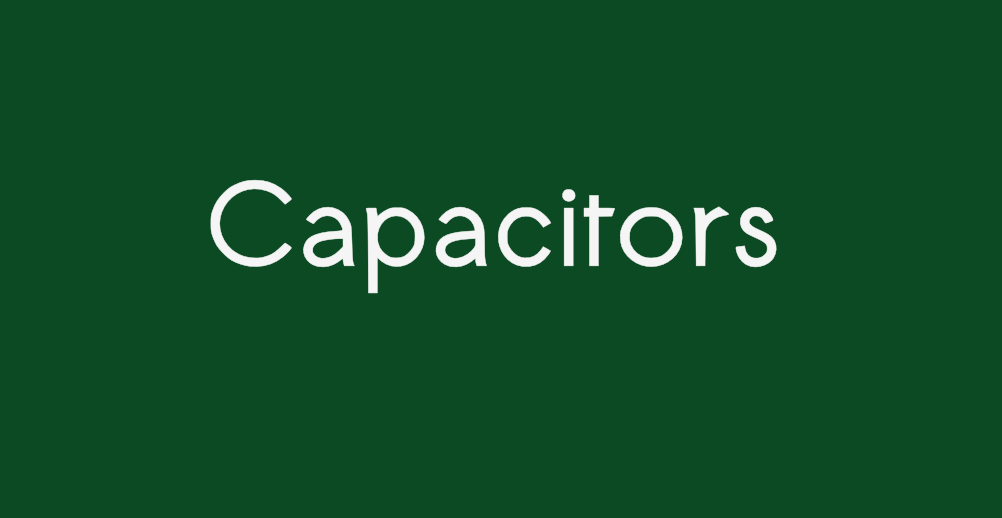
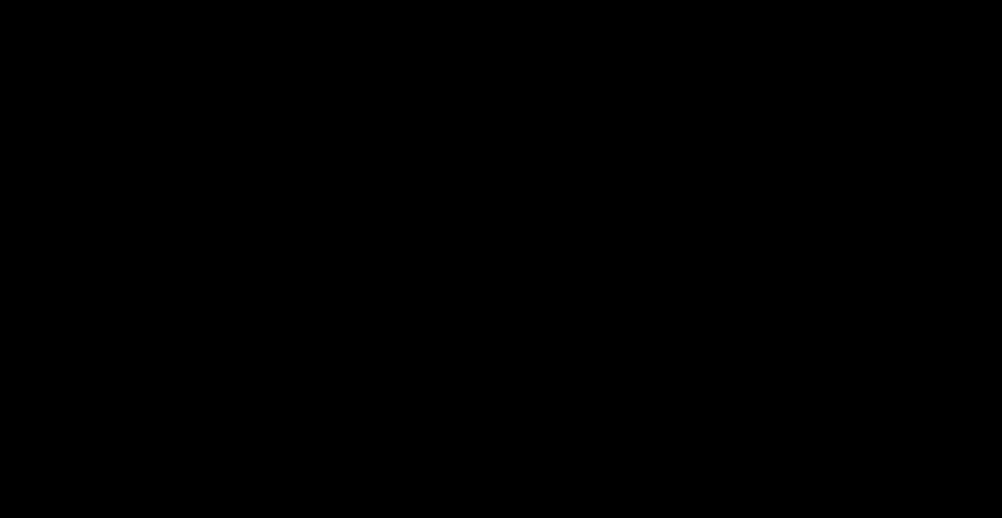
drawing: [210, 179, 777, 294] -> none

